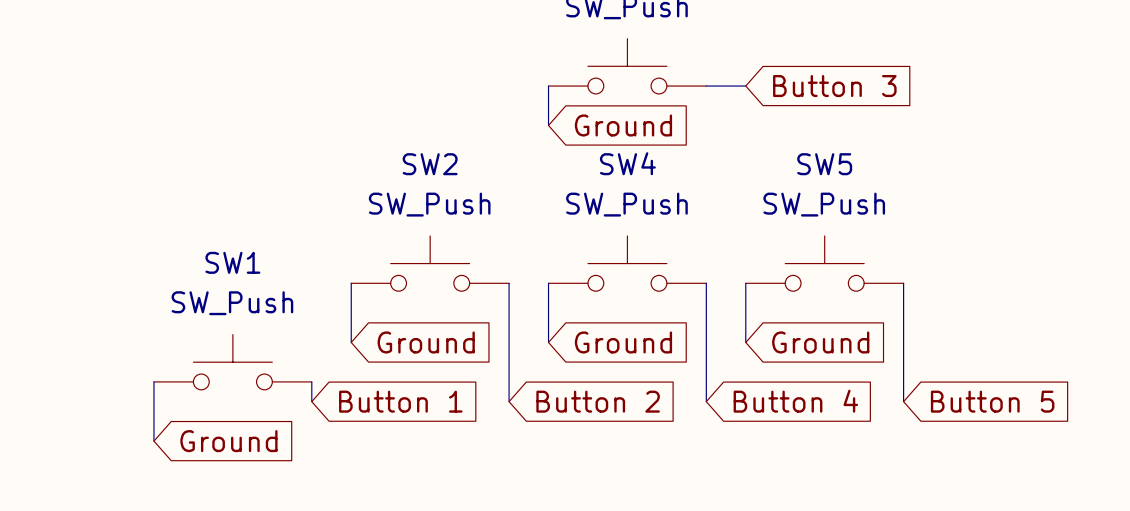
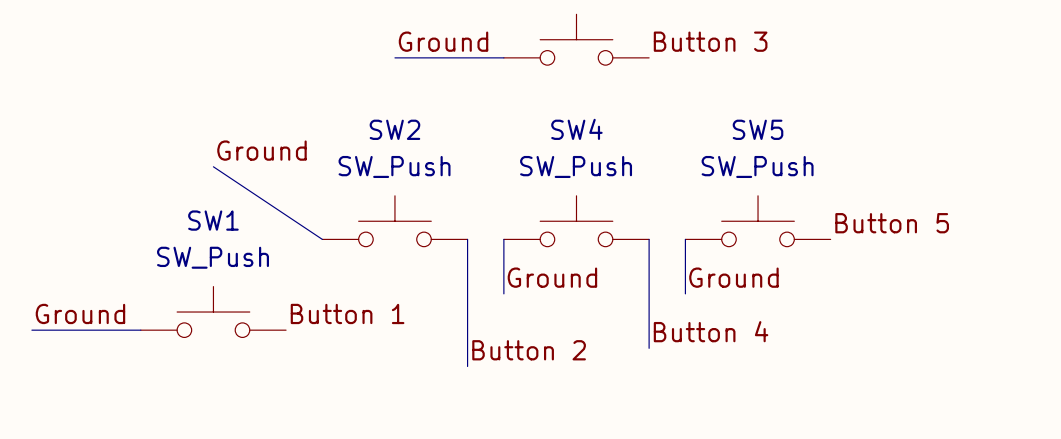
label: none -> Ground (443, 41)
label: none -> Button 3 (710, 41)
wire: (548, 86) (548, 125) -> (503, 57) (394, 57)
wire: (706, 86) (745, 86) -> none
global label: Button 3 (834, 86) -> none
global label: Ground (623, 125) -> none
label: none -> Ground (261, 150)
label: none -> Button 5 (892, 223)
wire: (351, 283) (351, 342) -> (322, 239) (213, 166)
wire: (903, 283) (903, 401) -> none
label: none -> Ground (552, 277)
label: none -> Ground (733, 277)
global label: Ground (426, 342) -> none
global label: Ground (623, 342) -> none
global label: Ground (820, 342) -> none
label: none -> Ground (80, 313)
label: none -> Button 1 (347, 313)
wire: (153, 381) (153, 441) -> (140, 330) (31, 330)
wire: (311, 381) (311, 401) -> (467, 348) (467, 366)
label: none -> Button 4 (711, 331)
global label: Button 1 (400, 401) -> none
global label: Button 2 (598, 401) -> none
global label: Button 4 (795, 401) -> none
global label: Button 5 (992, 401) -> none
label: none -> Button 2 (529, 350)
global label: Ground (228, 441) -> none

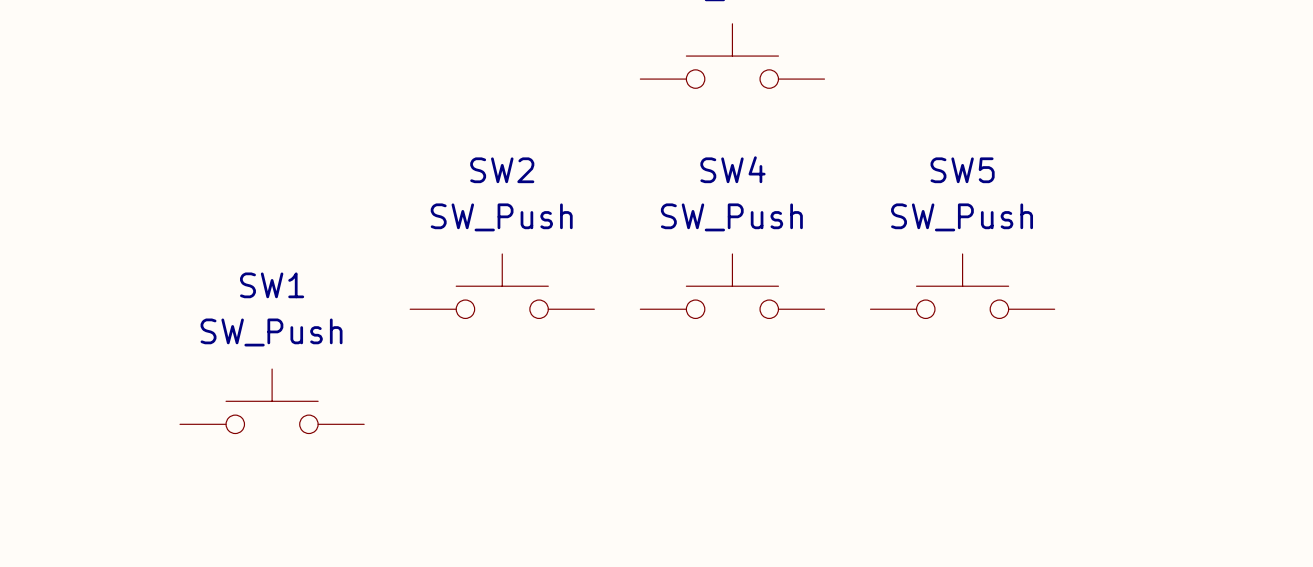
label: Ground (443, 41) -> none
label: Button 3 (710, 41) -> none
wire: (394, 57) (503, 57) -> none
label: Ground (261, 150) -> none
wire: (213, 166) (322, 239) -> none
label: Button 5 (892, 223) -> none
wire: (467, 239) (467, 366) -> none
wire: (503, 239) (503, 293) -> none
wire: (649, 239) (649, 348) -> none
wire: (685, 239) (685, 293) -> none
label: Ground (552, 277) -> none
label: Ground (733, 277) -> none
label: Ground (80, 313) -> none
label: Button 1 (347, 313) -> none
wire: (31, 330) (140, 330) -> none
label: Button 4 (711, 331) -> none
label: Button 2 (529, 350) -> none

